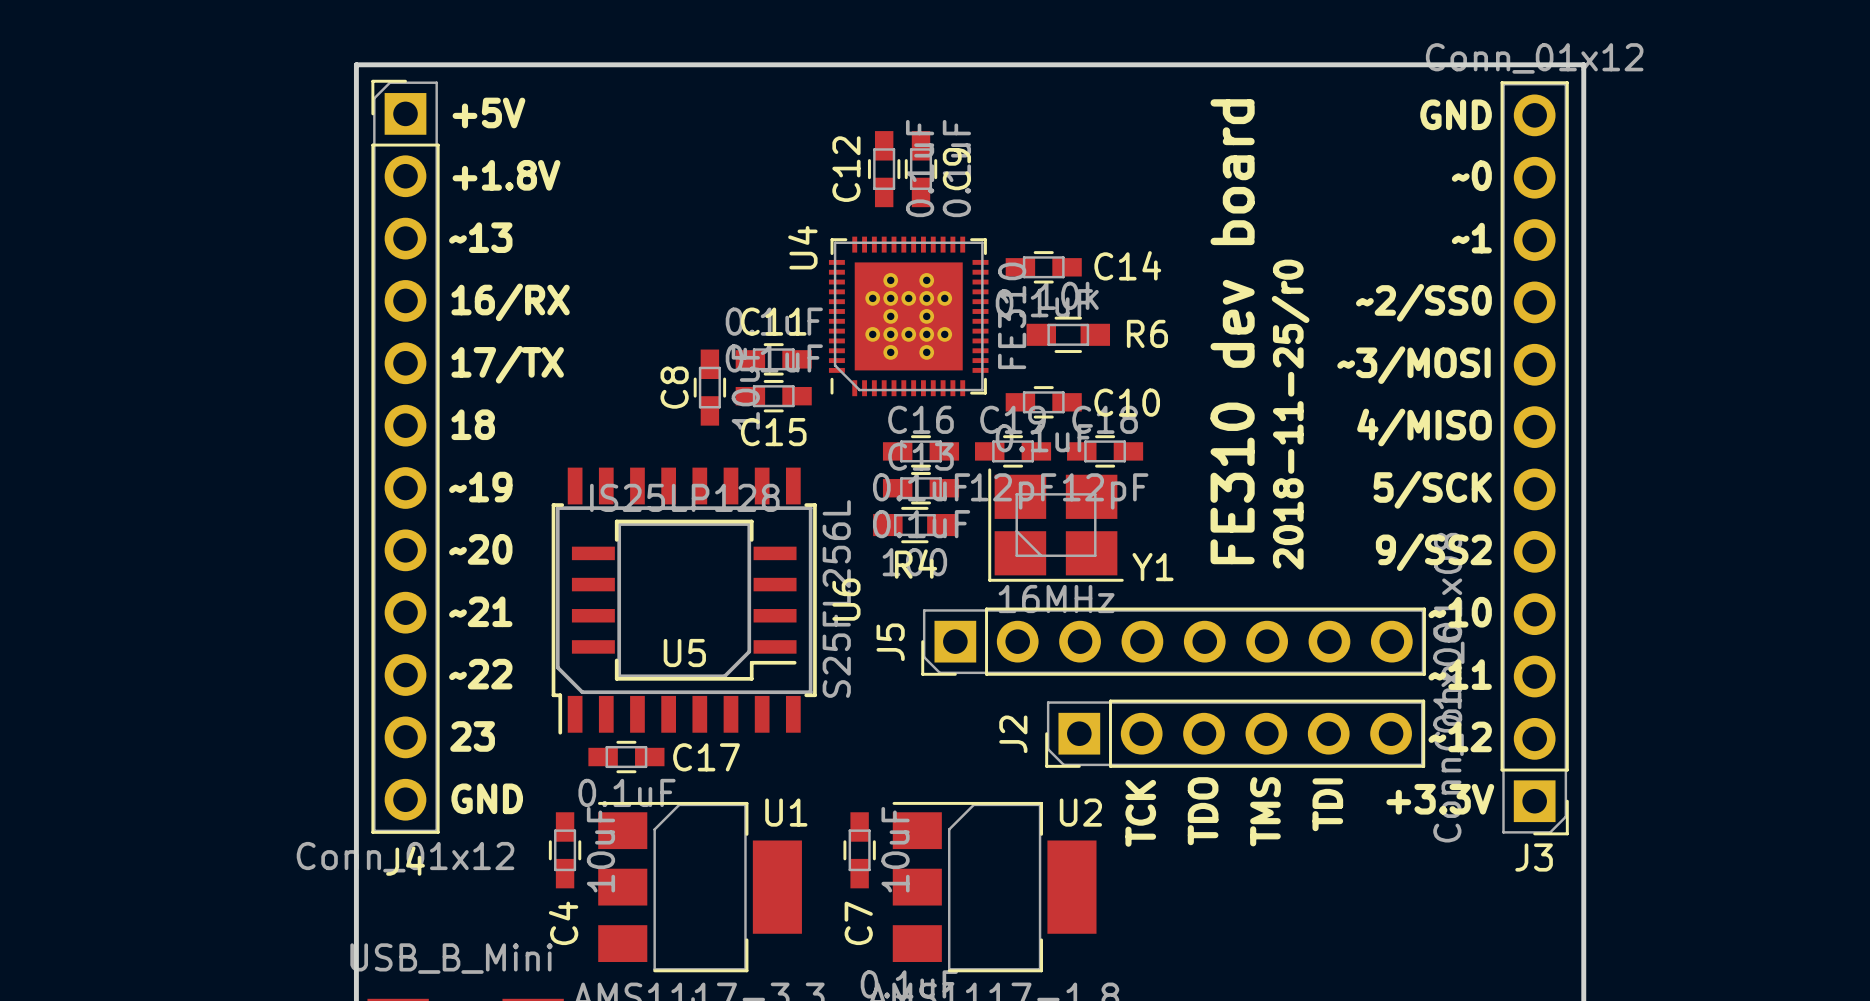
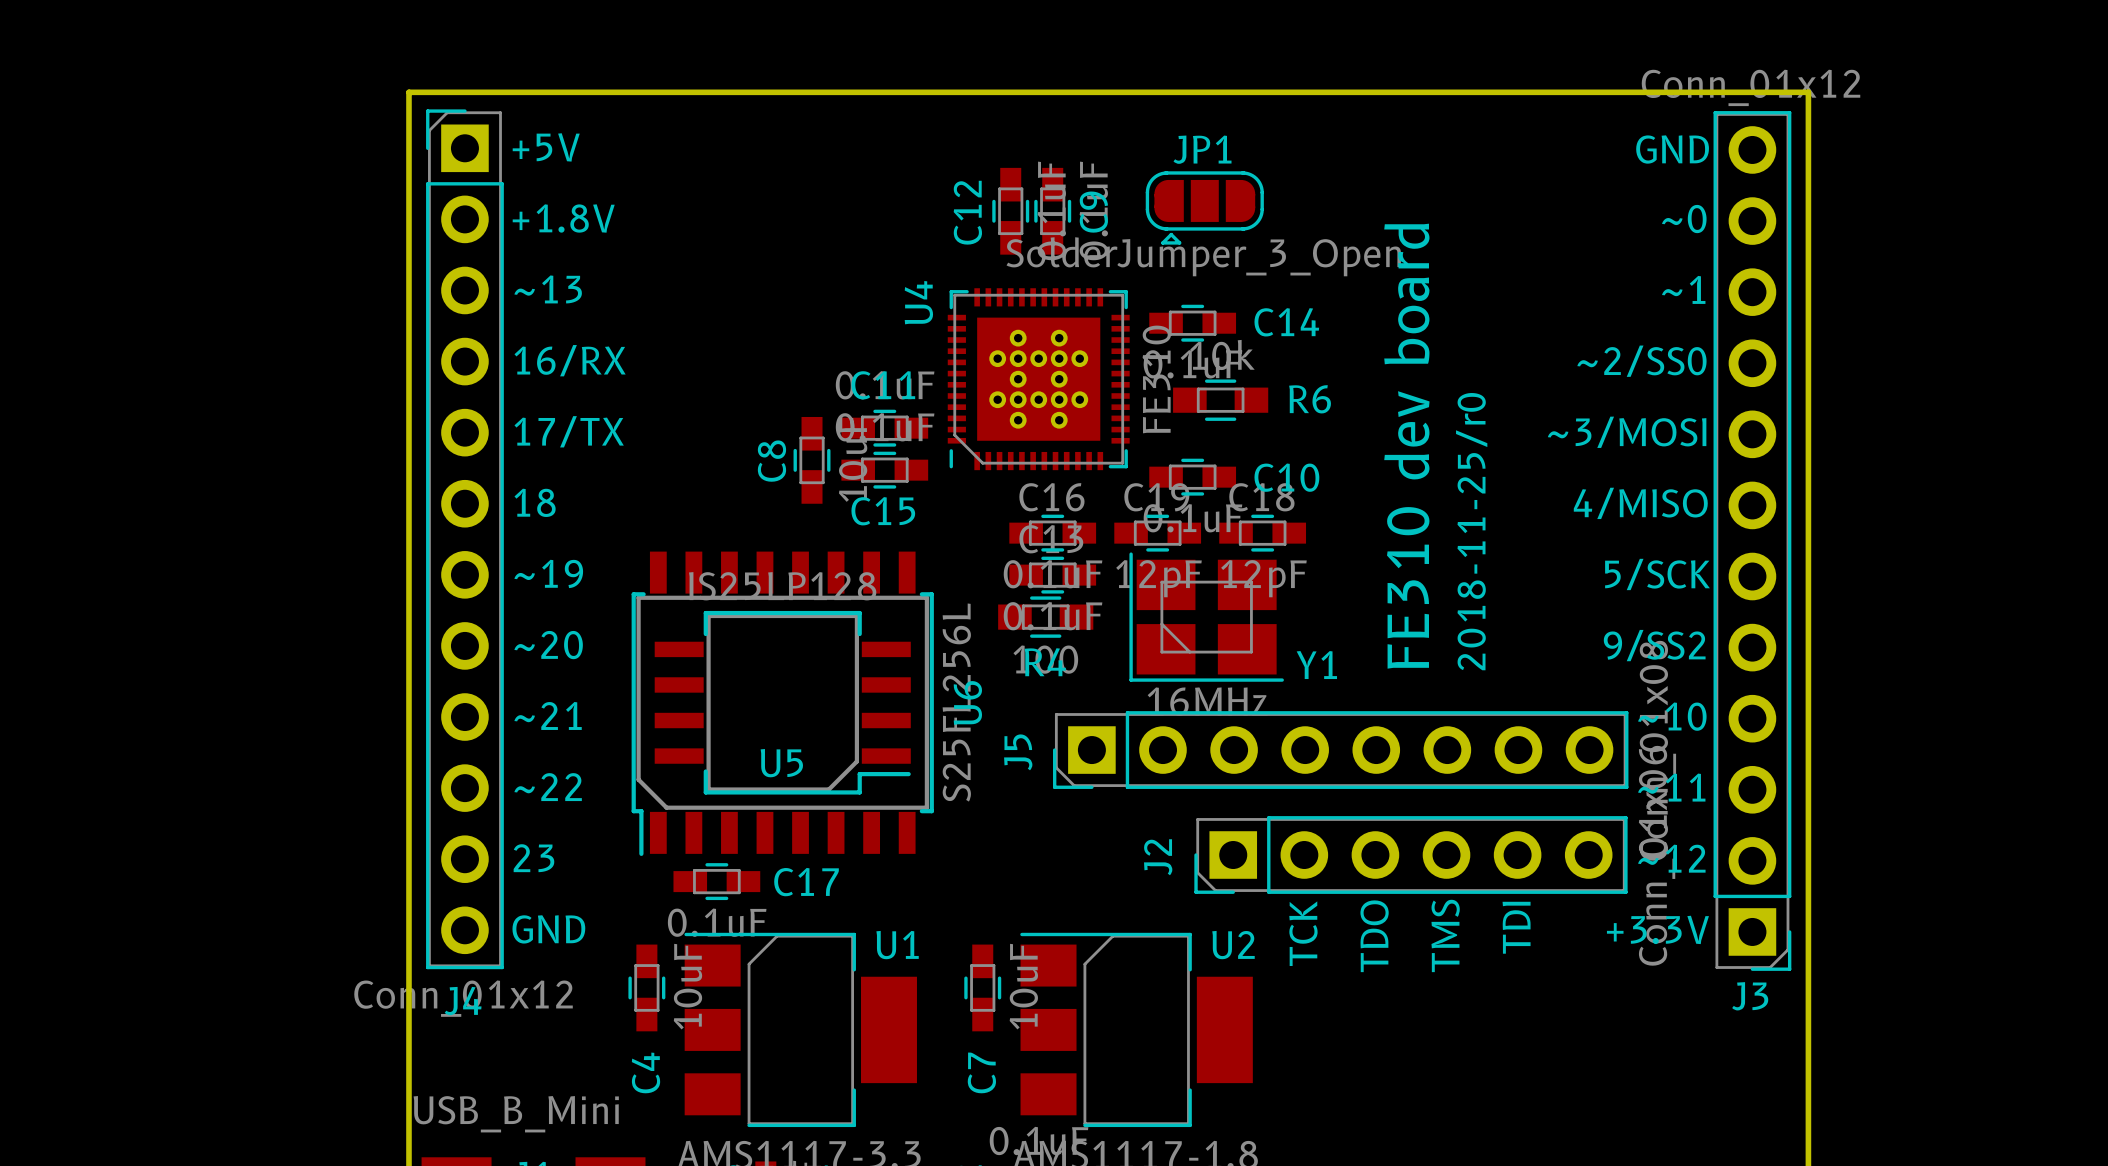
JP1: none -> SolderJumper_3_Open (1204, 207)

